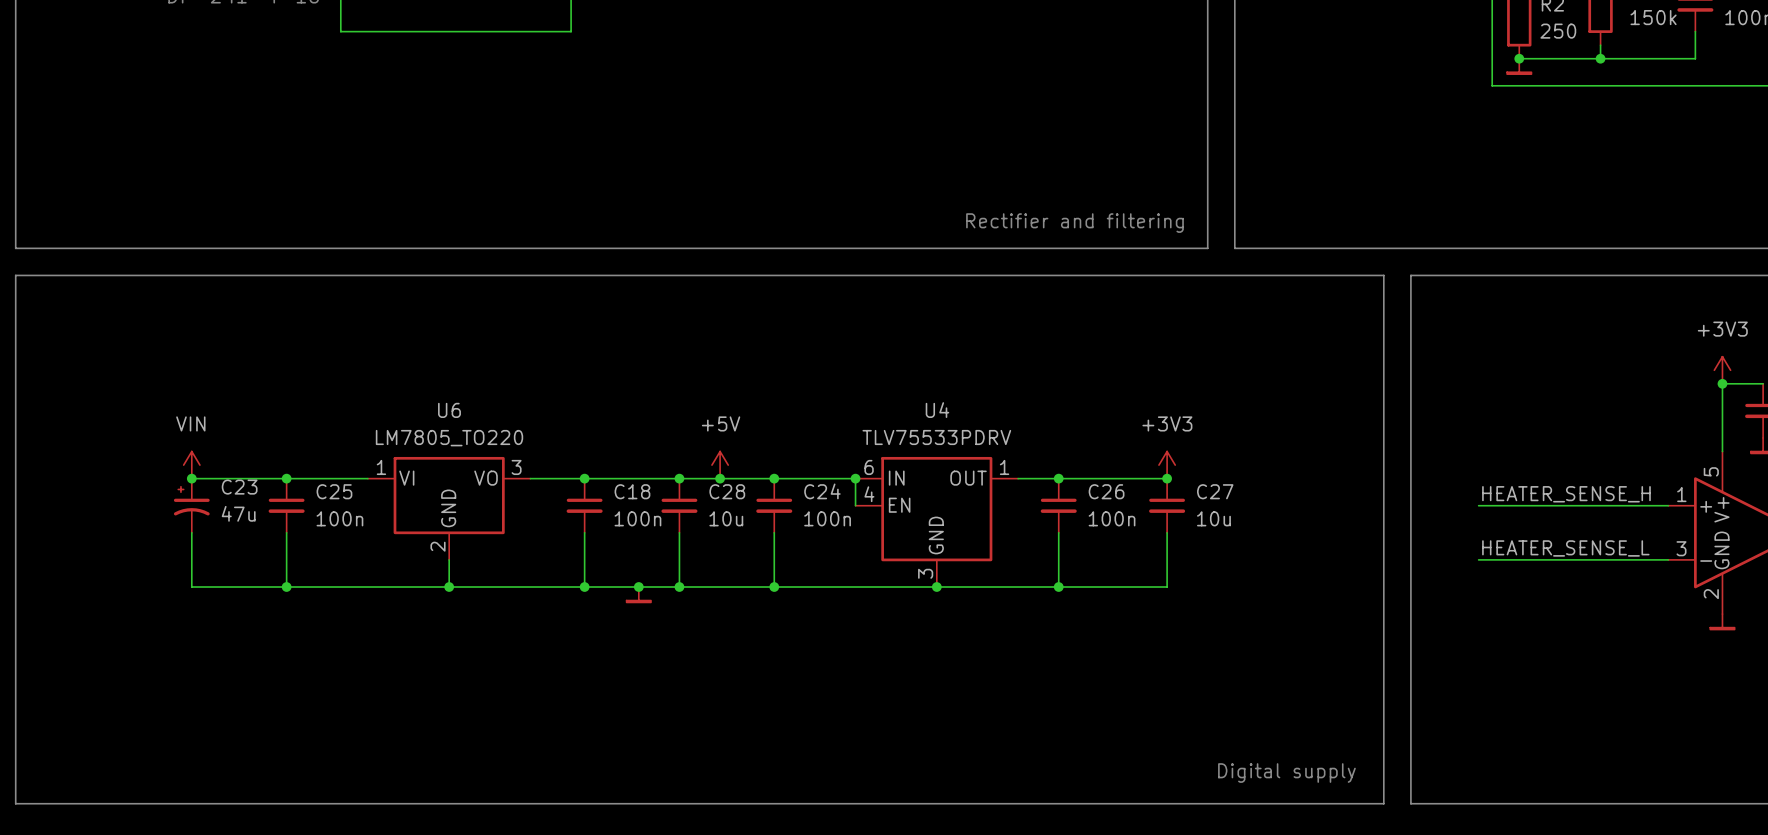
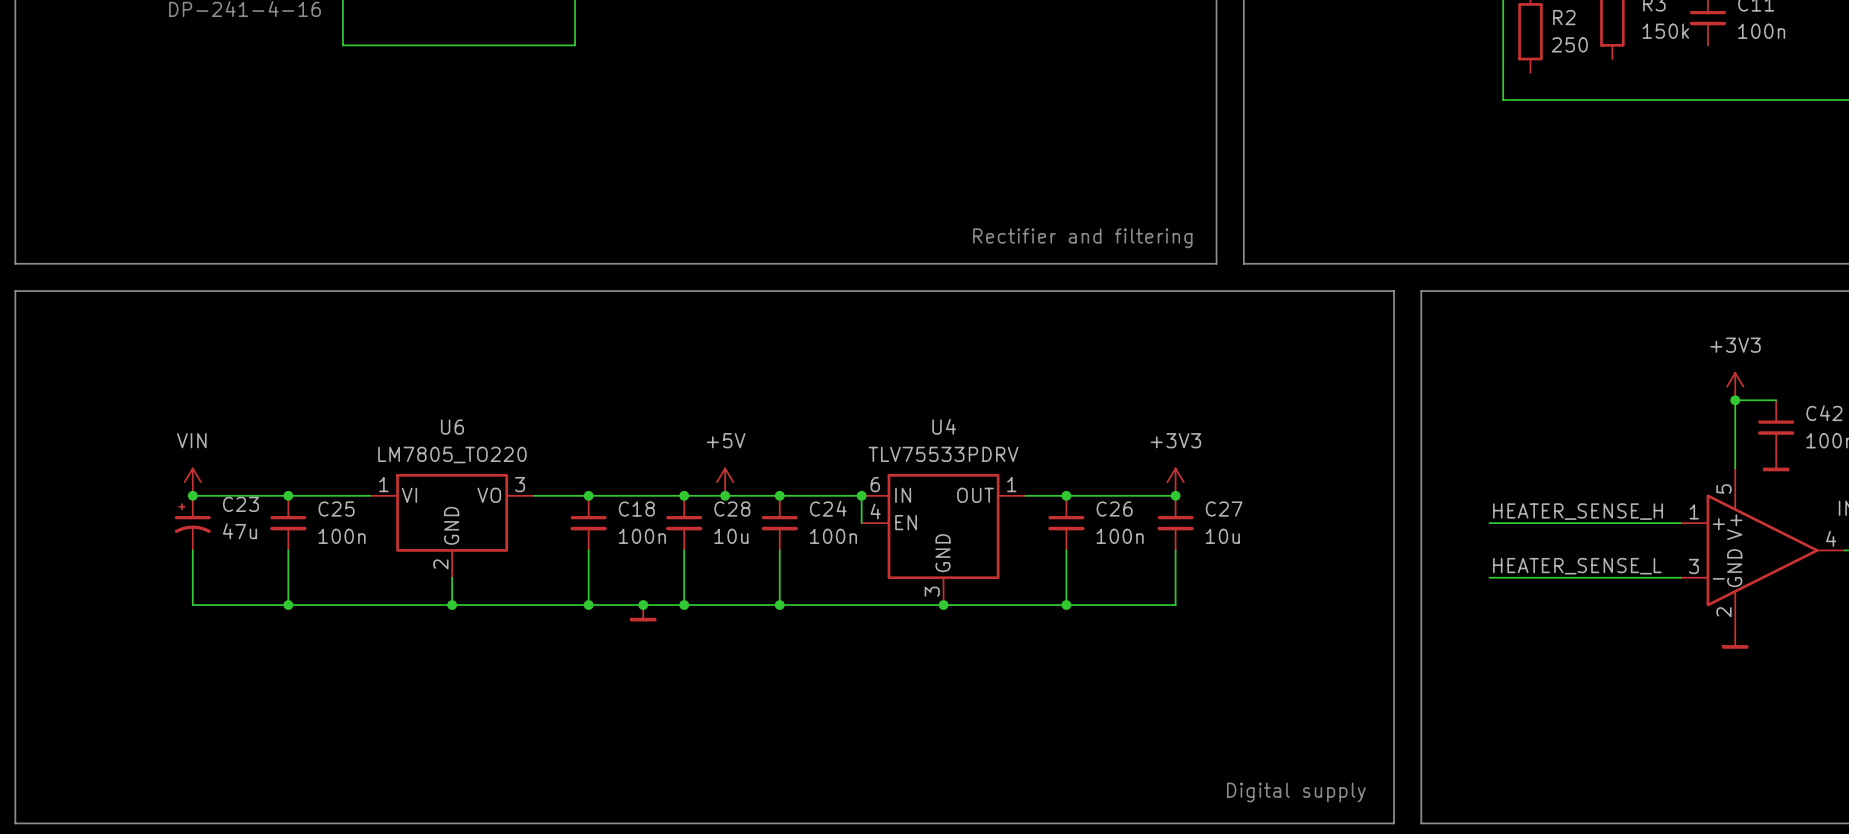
wire: (1695, 31) (1695, 58) (1519, 58) -> none
wire: (1600, 45) (1600, 58) -> none
junction: (1519, 58) -> none
junction: (1600, 58) -> none
power symbol: (1519, 66) -> none

